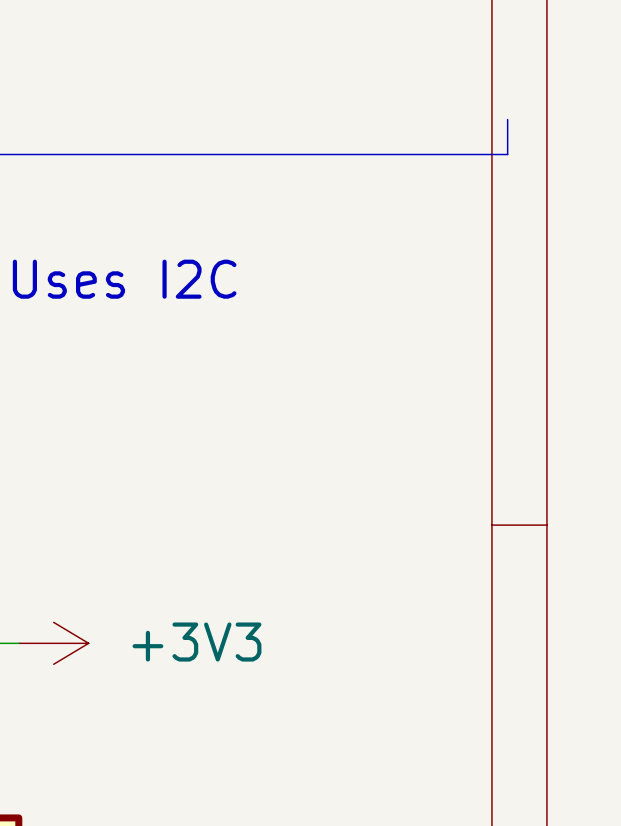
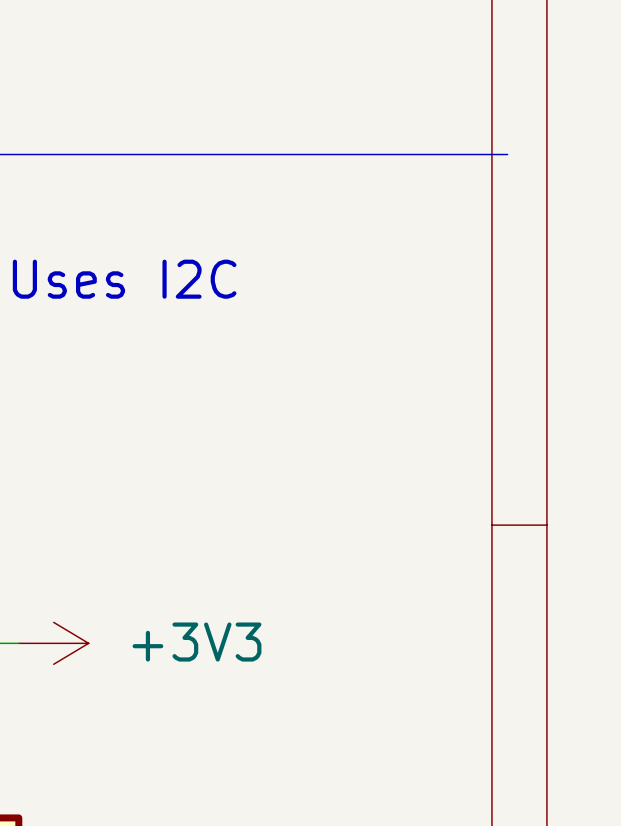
line: (507, 119) (507, 154) -> none

